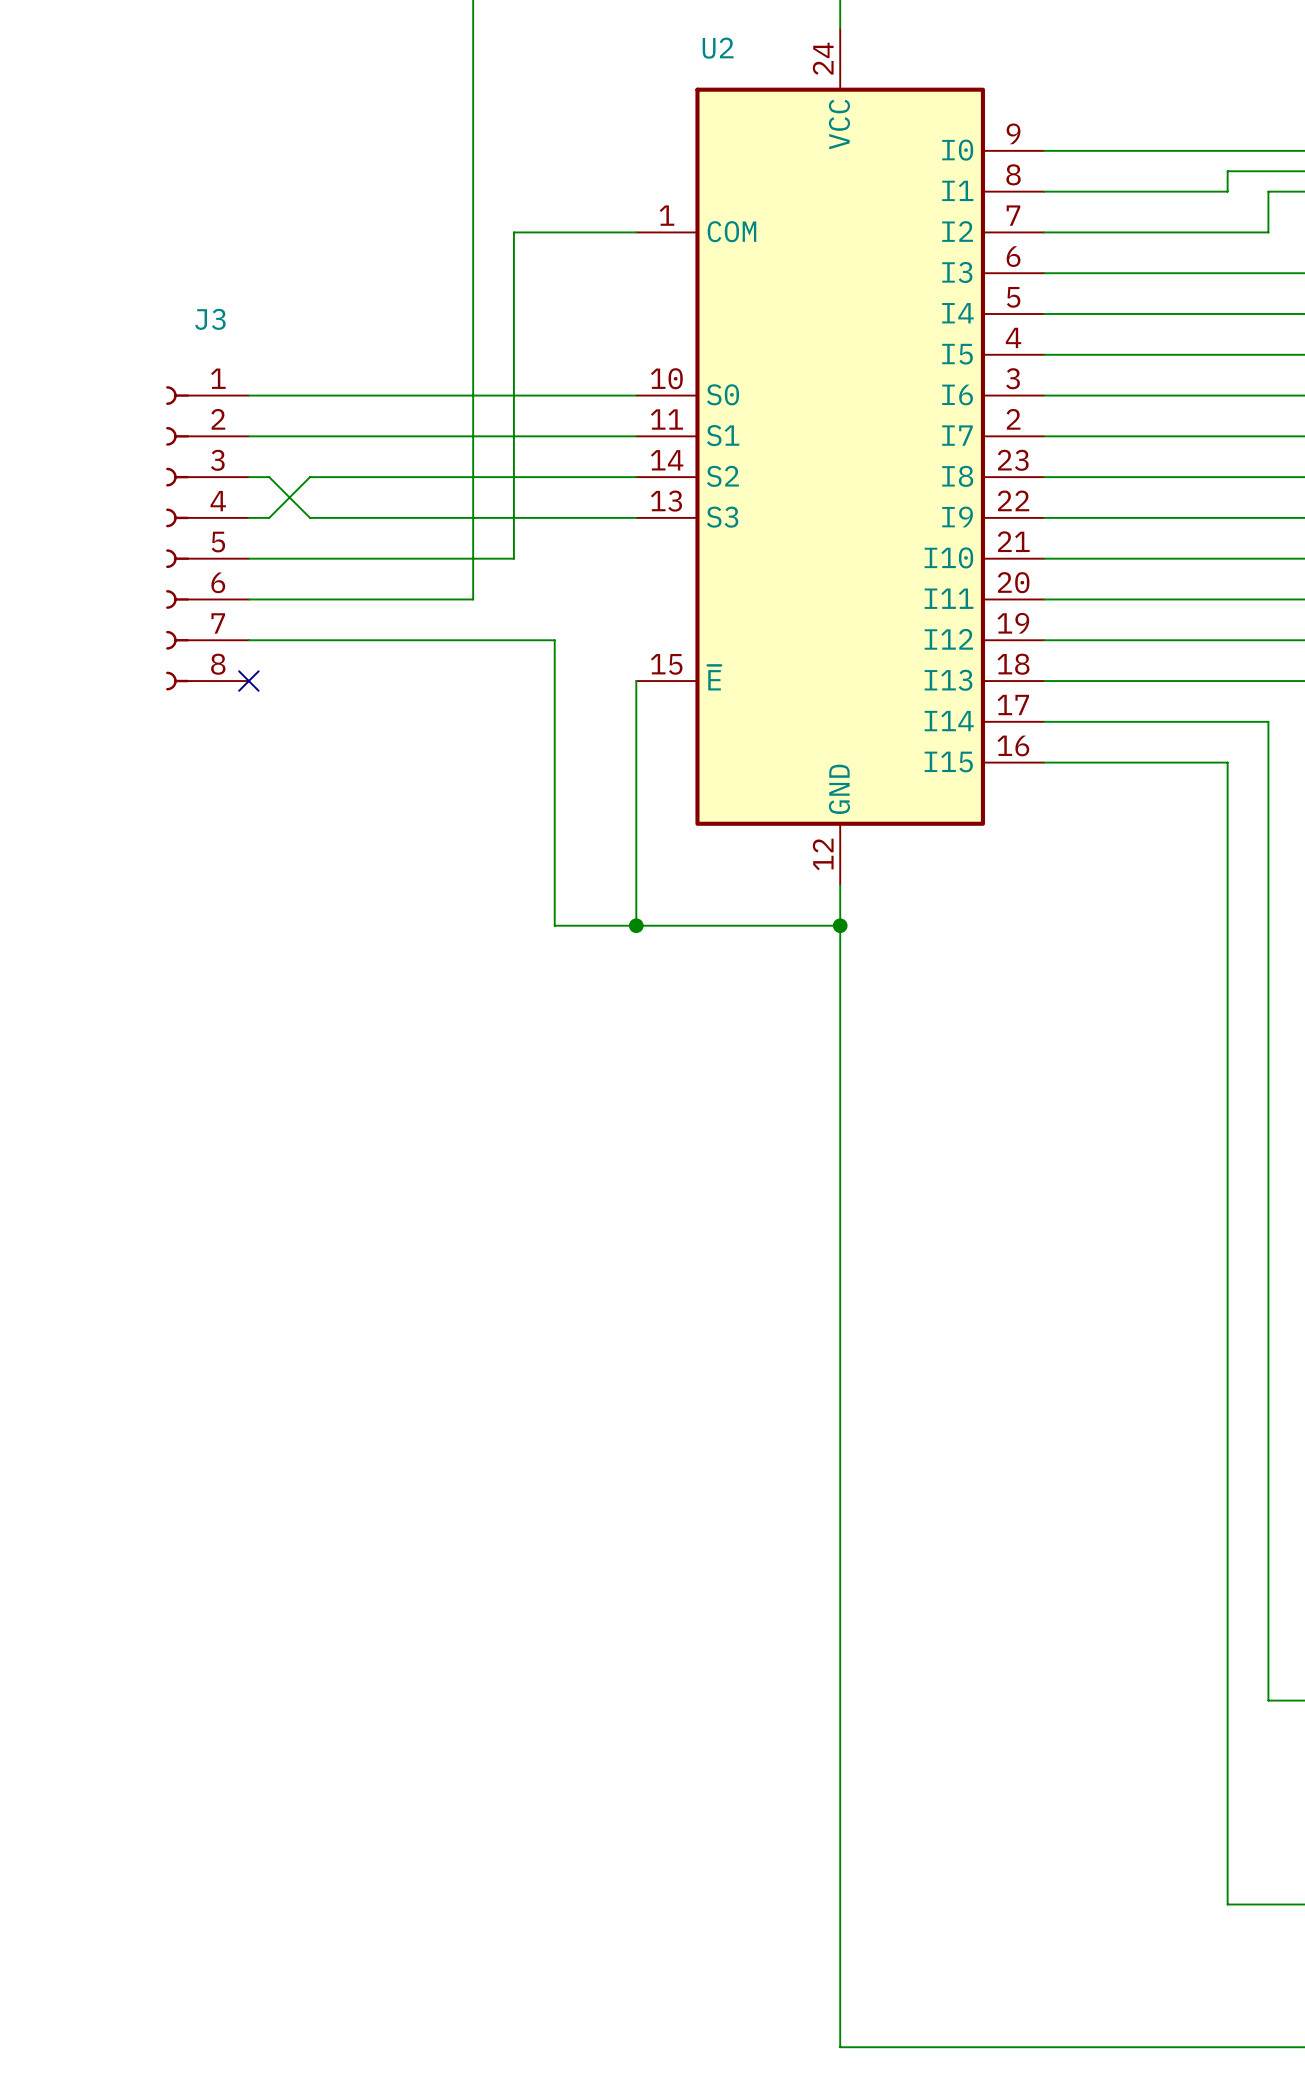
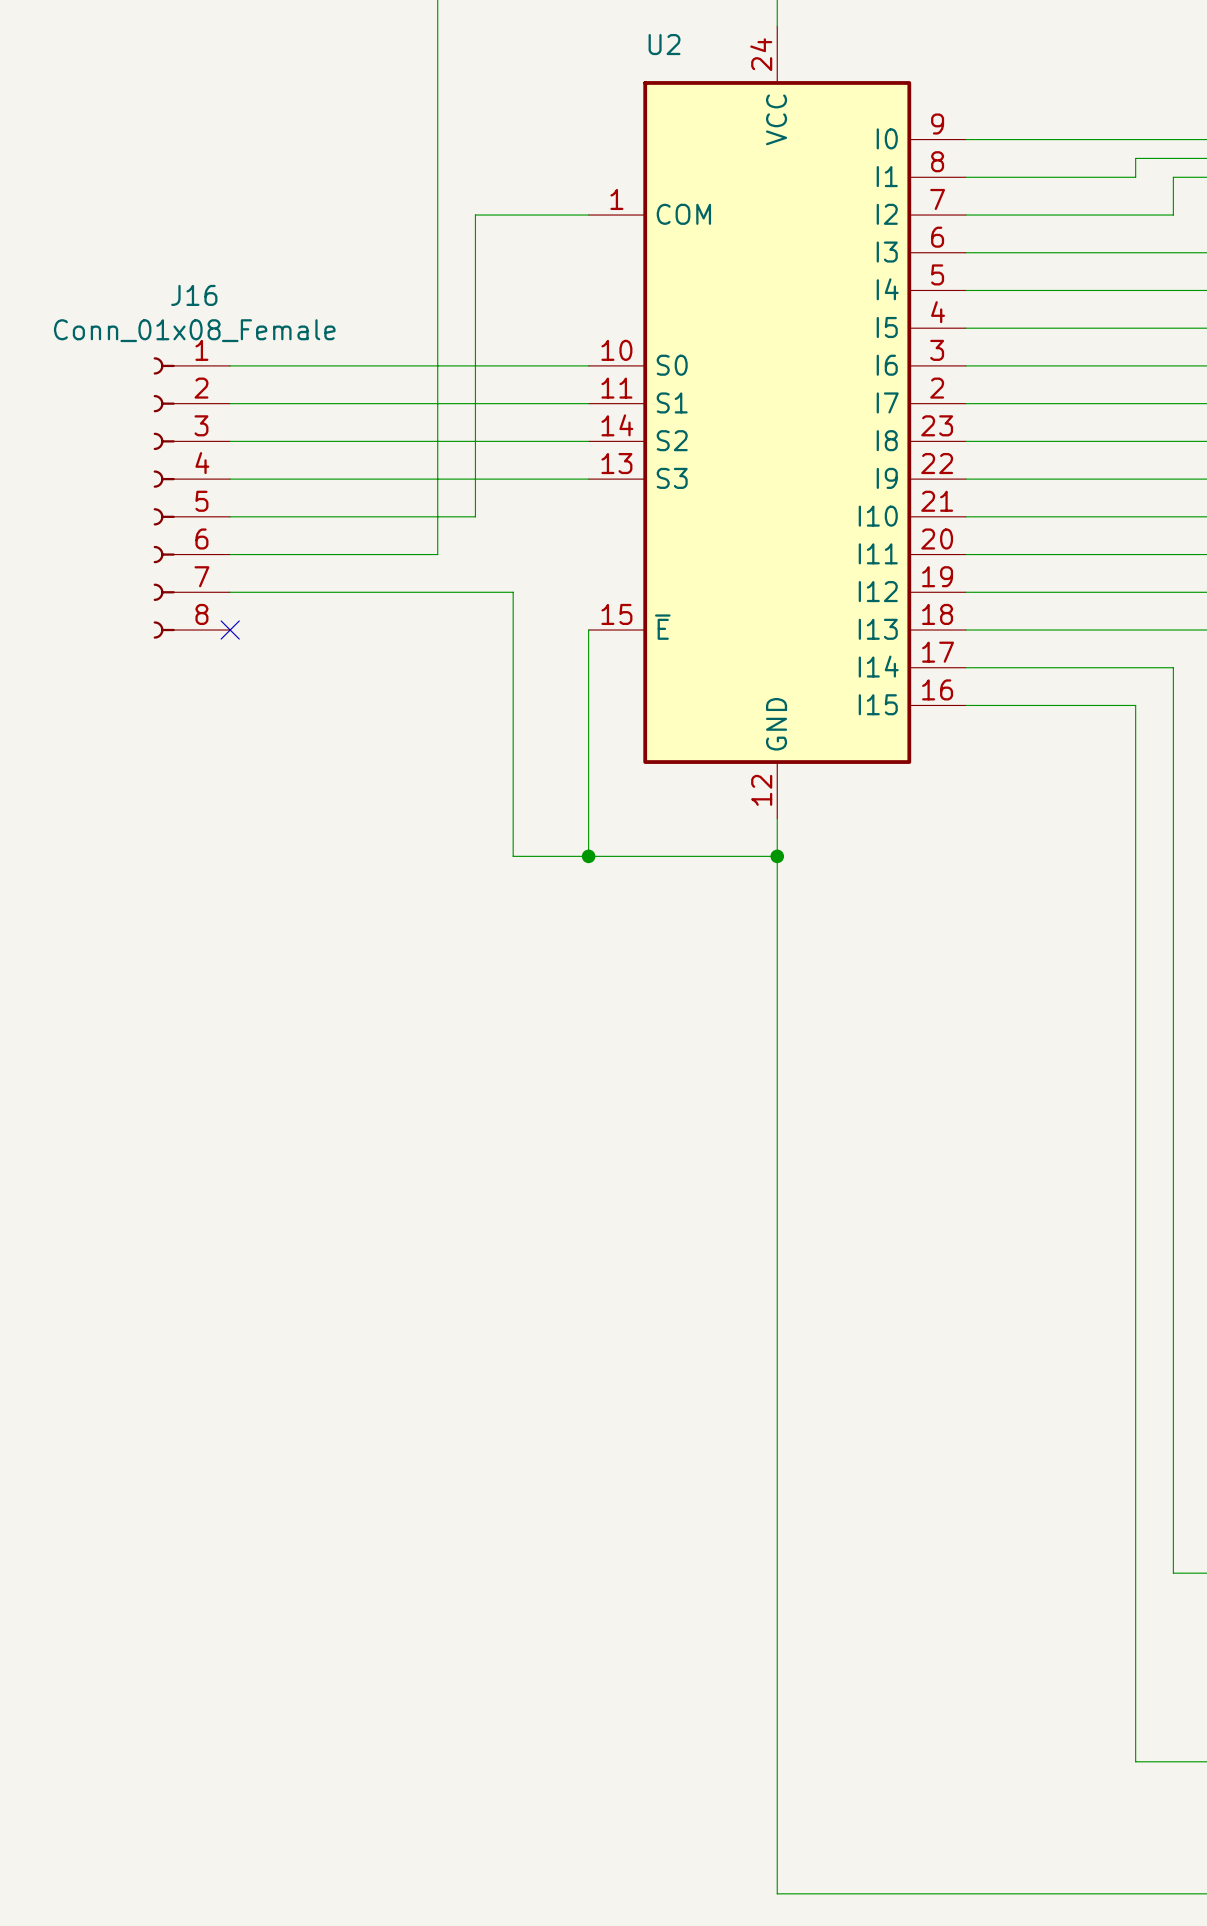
J3 name: J3 (210, 319) -> J16 (194, 295)
J3 value: none -> Conn_01x08_Female (194, 330)
wire: (269, 477) (310, 517) -> (249, 441) (286, 441)
wire: (310, 477) (269, 517) -> (286, 479) (249, 479)

